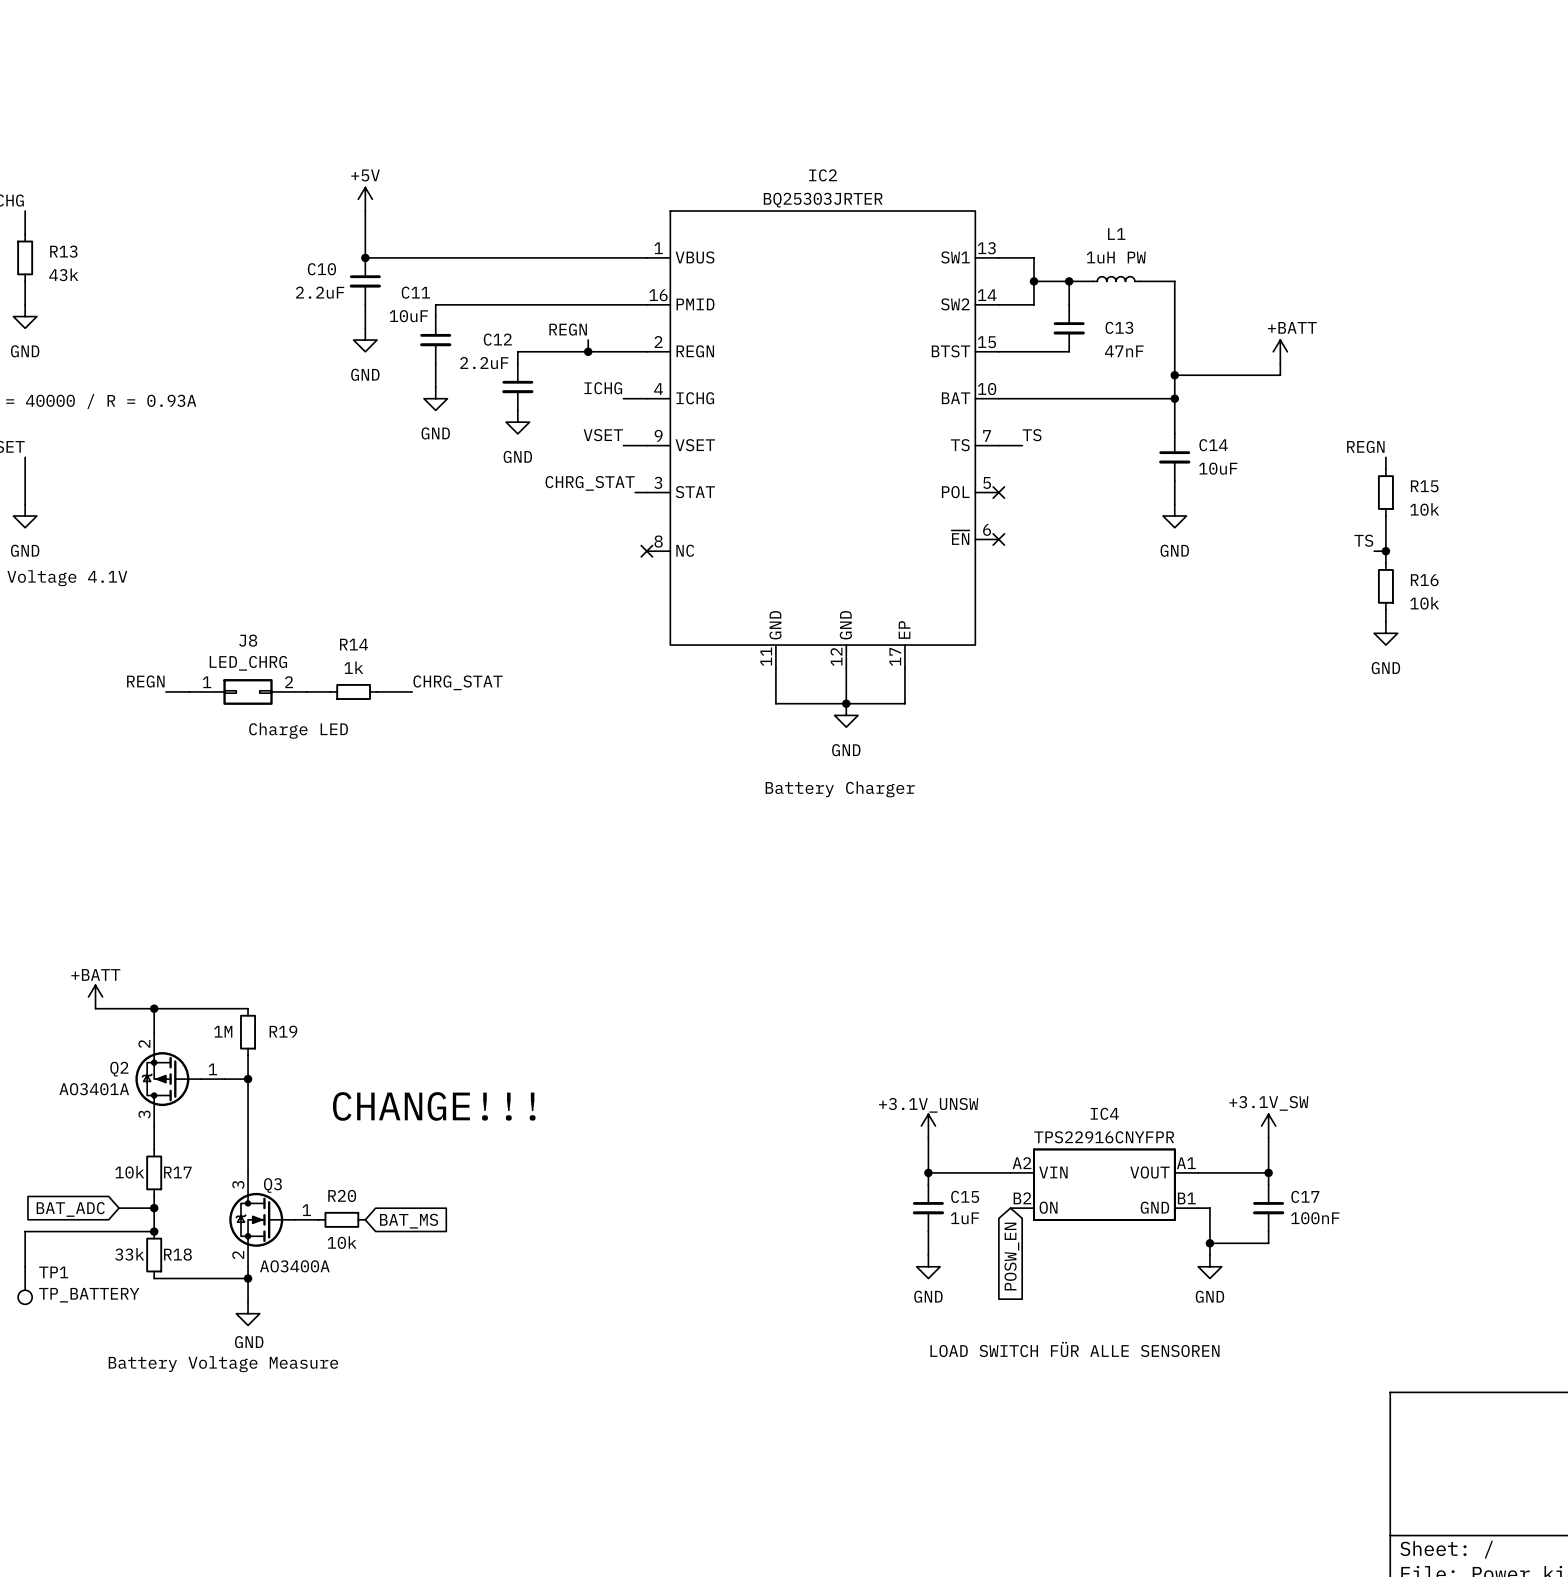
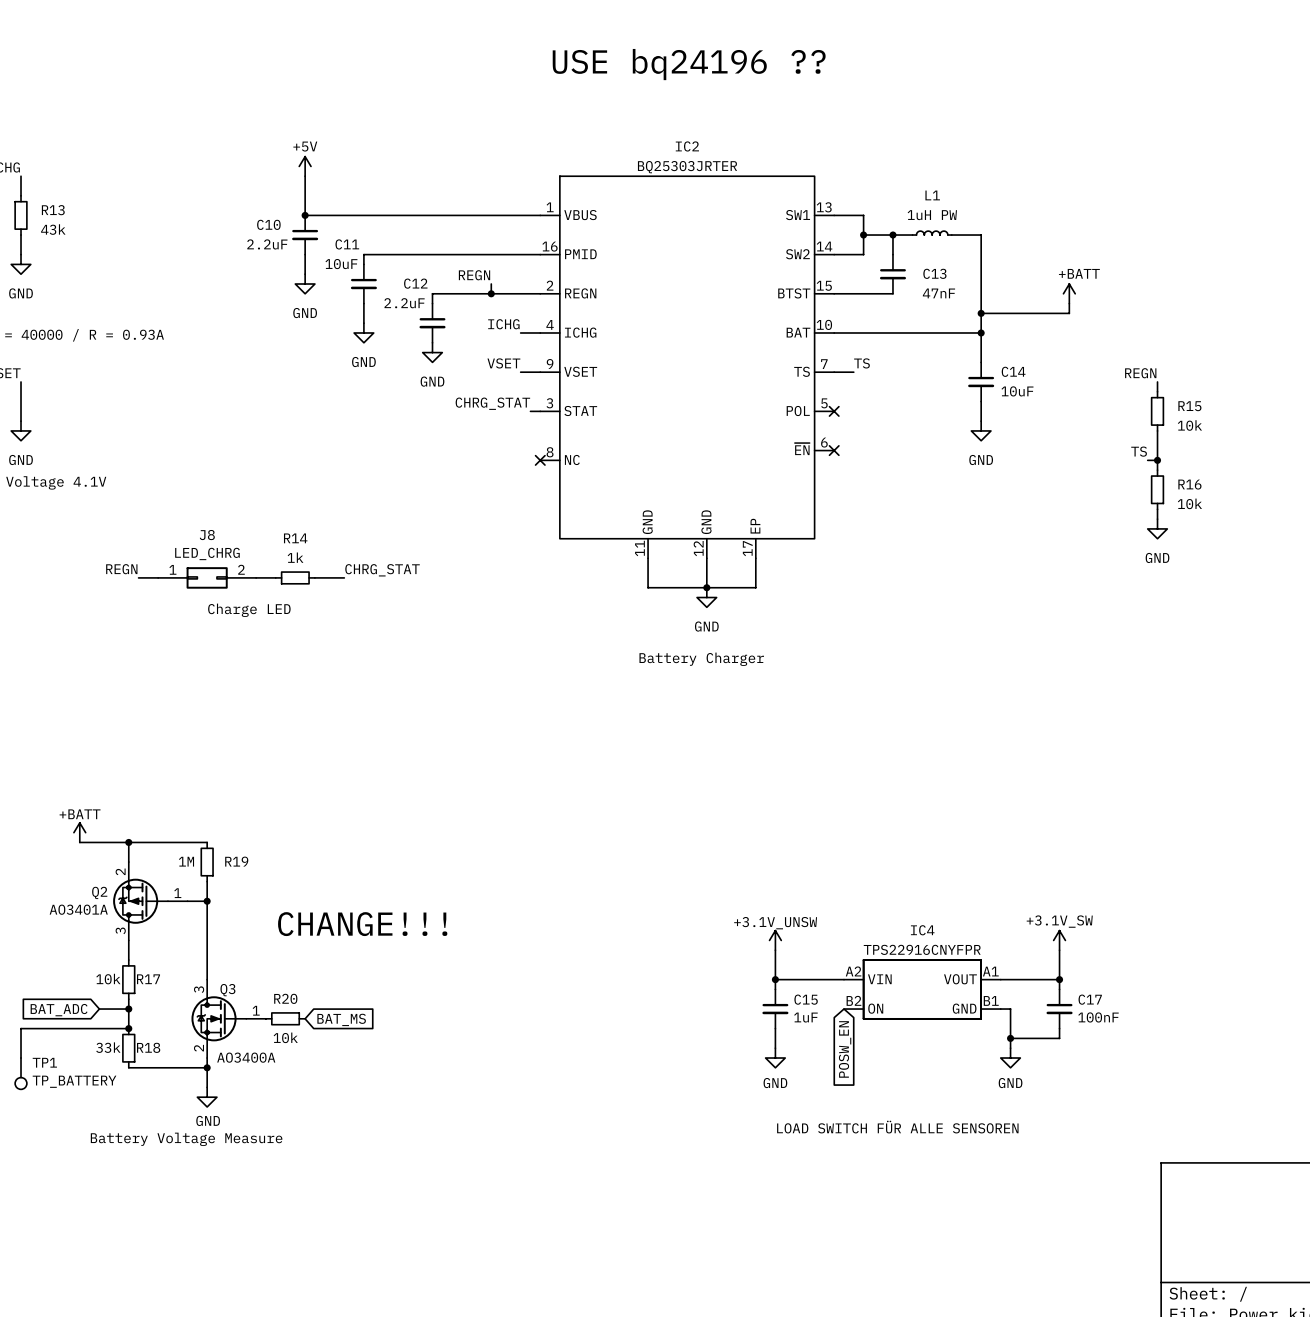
text: none -> USE bq24196 ?? (689, 64)

